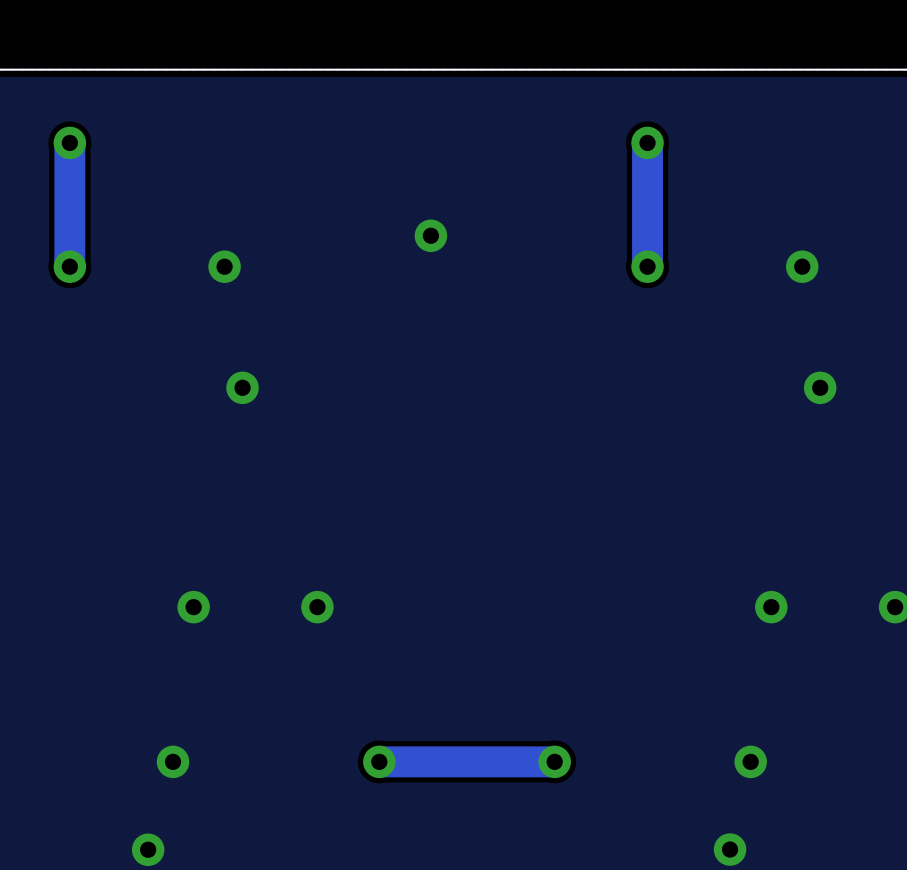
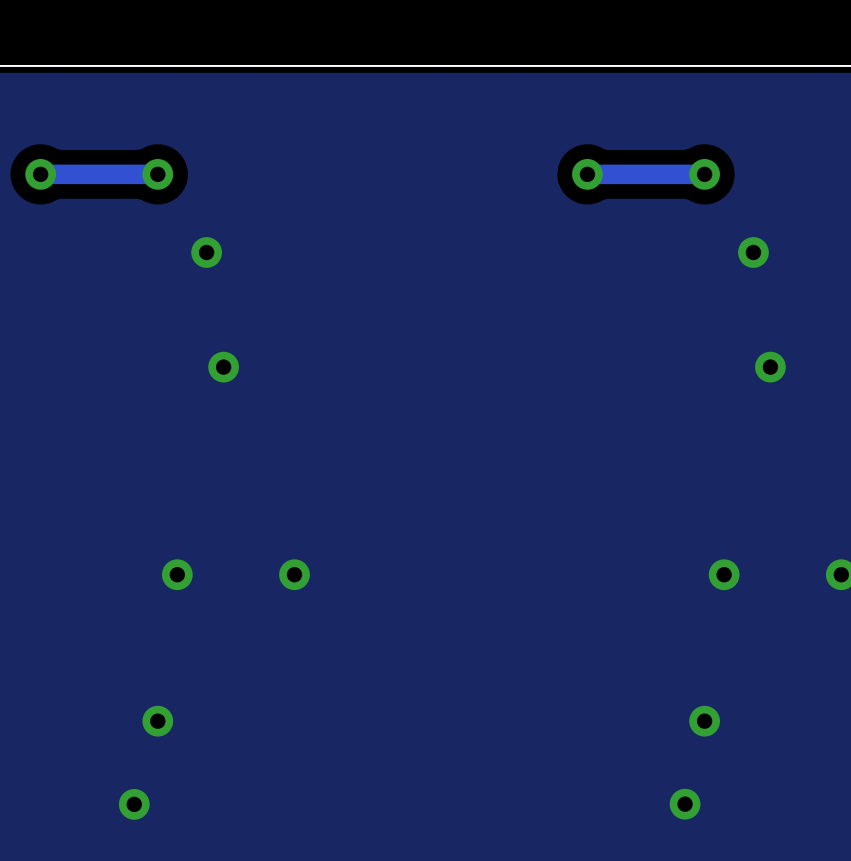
track: (69, 142) (69, 266) -> none
via: (69, 142) -> none
track: (647, 142) (647, 266) -> none
via: (647, 142) -> none
via: none -> (40, 174)
track: none -> (157, 174) (40, 174)
via: none -> (157, 174)
via: none -> (587, 174)
track: none -> (704, 174) (587, 174)
via: none -> (704, 174)
via: (430, 235) -> none
via: (69, 266) -> none
via: (647, 266) -> none
via: (379, 761) -> none
track: (554, 761) (379, 761) -> none
via: (554, 761) -> none

